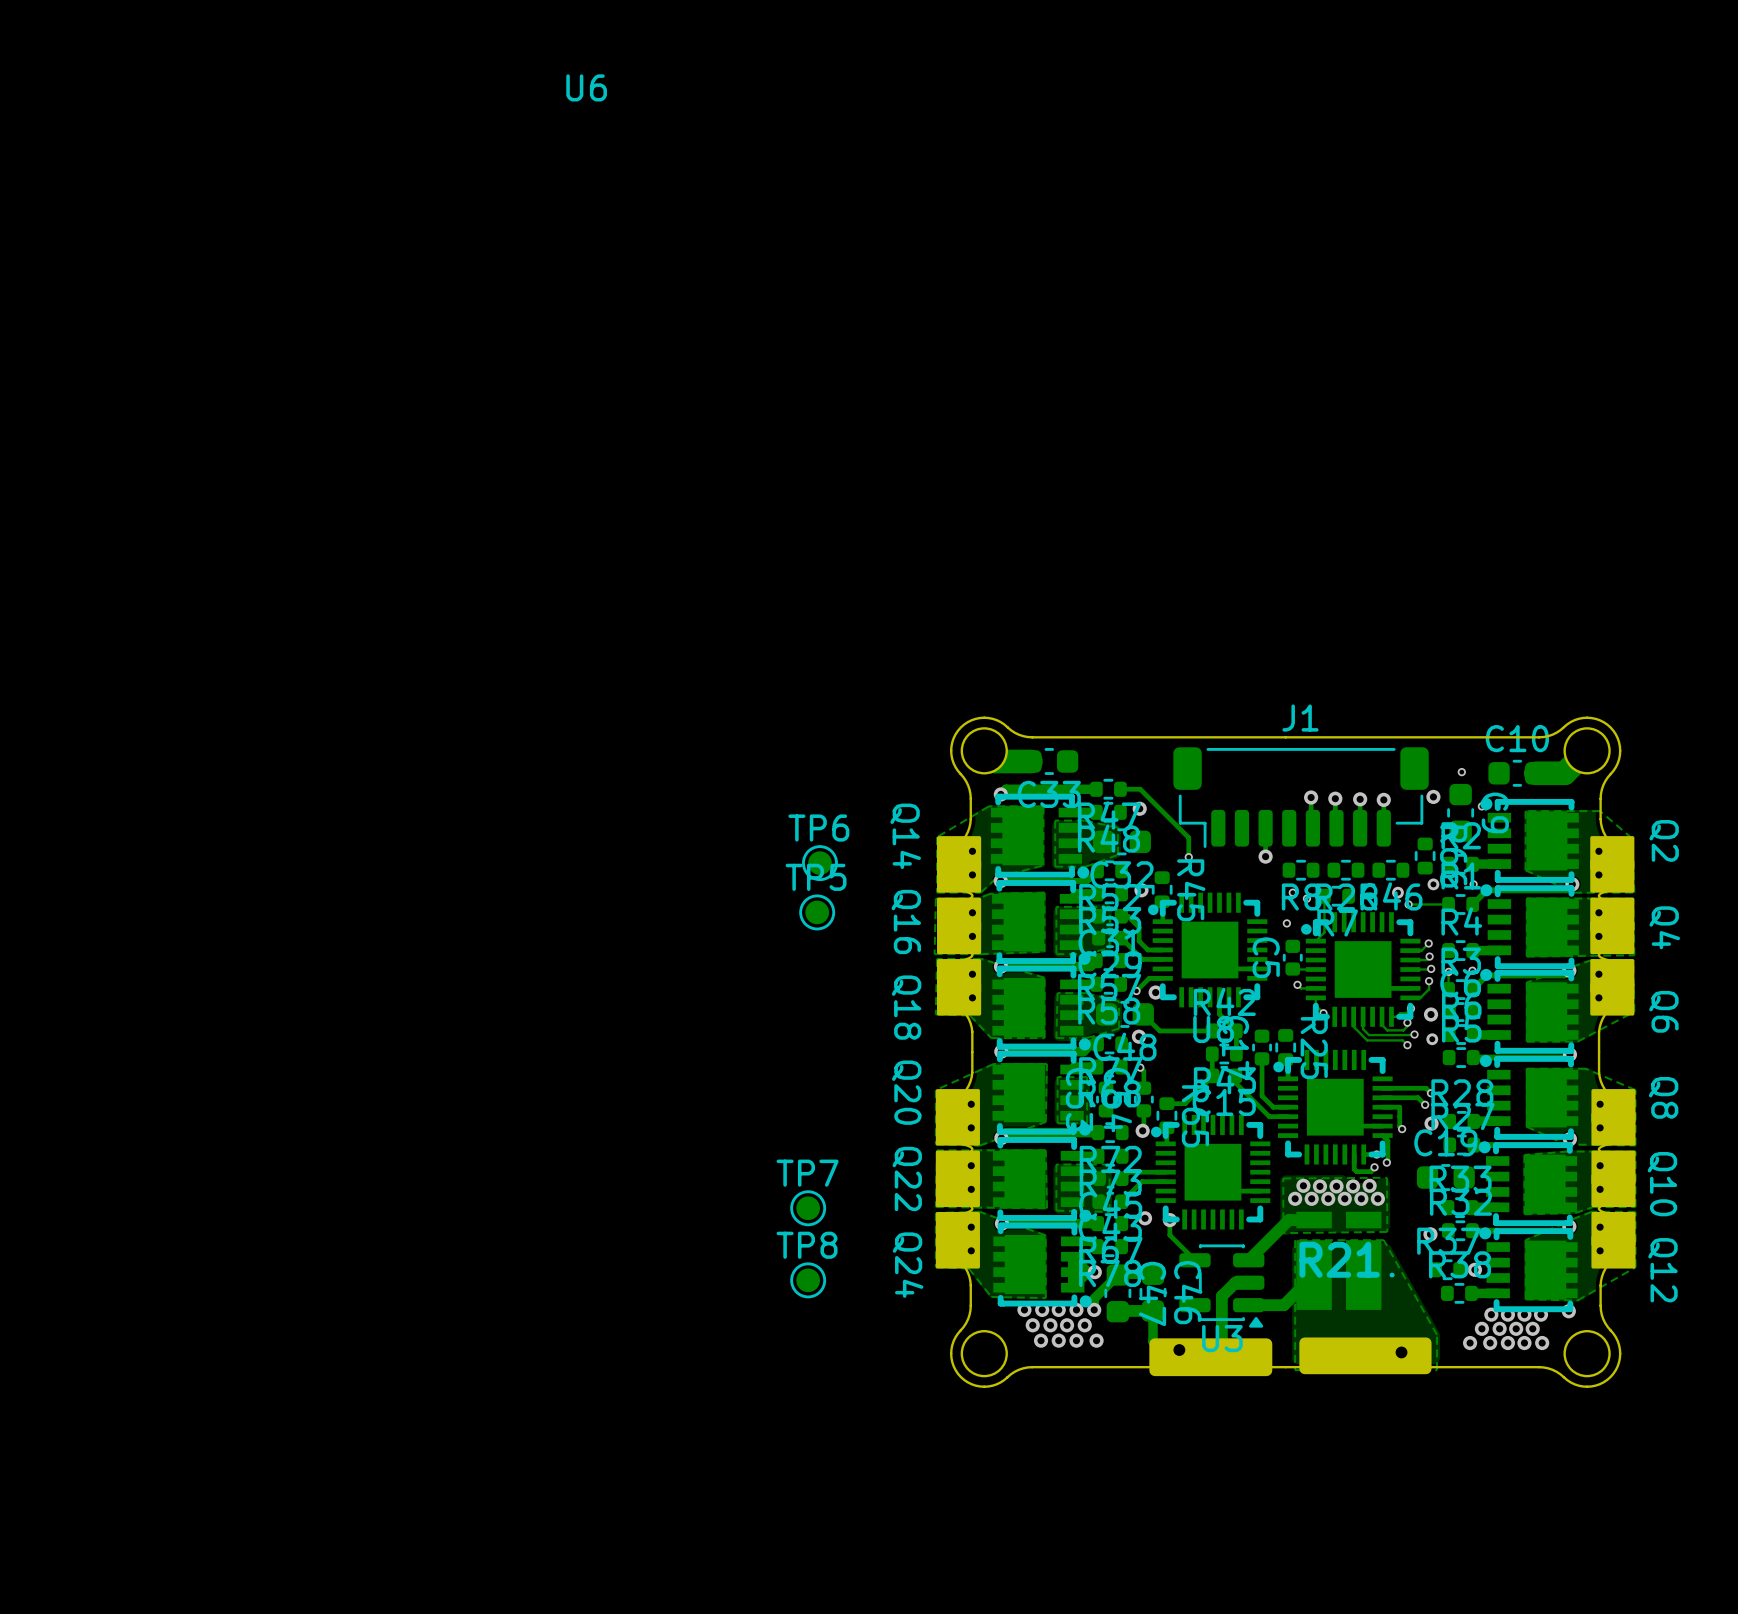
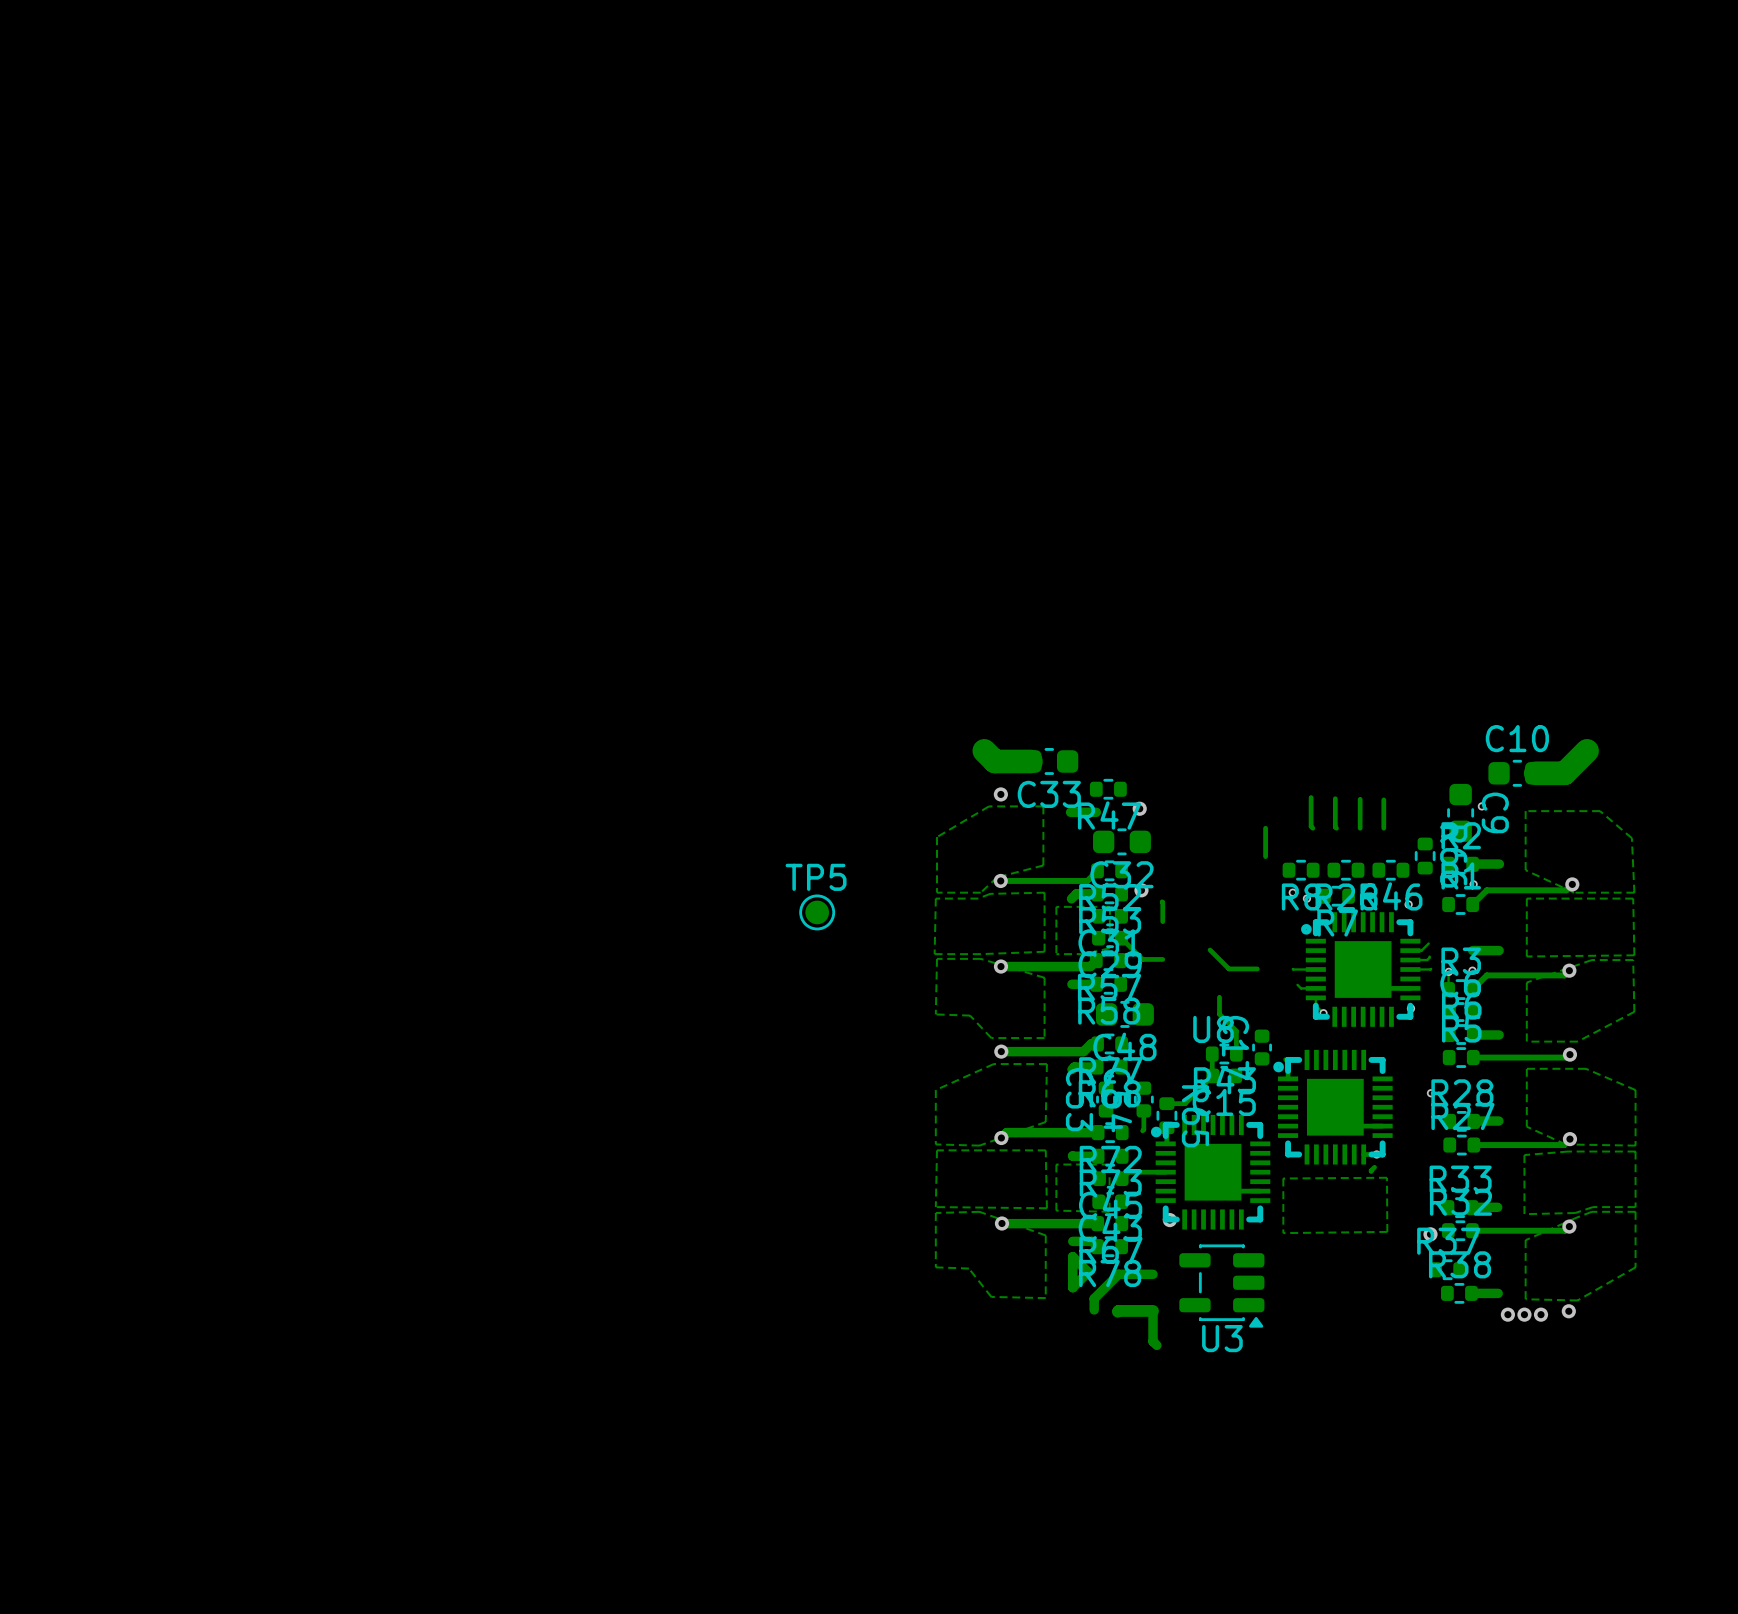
via: (1461, 772) -> none
track: (1096, 789) (1006, 789) (1000, 794) -> none
track: (1120, 789) (1140, 789) (1188, 837) (1188, 857) -> none
via: (1433, 796) -> none
J1: (1301, 797) -> none
via: (1311, 797) -> none
via: (1335, 798) -> none
via: (1360, 799) -> none
via: (1383, 799) -> none
R48: (1108, 812) -> none
zone outline: (1084, 820) (1117, 827) (1117, 854) (1085, 866) (1055, 866) (1055, 820) (1084, 820) -> none
Q14: (1040, 836) -> none
Q2: (1529, 840) -> none
via: (1265, 856) -> none
via: (1188, 857) -> none
TP6: (819, 863) -> none
via: (1433, 884) -> none
R45: (1162, 889) -> none
via: (1397, 892) -> none
track: (1324, 896) (1324, 932) (1315, 941) -> none
track: (1448, 904) (1408, 904) -> none
track: (1121, 916) (1128, 916) (1139, 927) (1139, 941) (1147, 950) (1162, 950) -> none
Q16: (1041, 922) -> none
via: (1286, 923) -> none
Q4: (1529, 926) -> none
via: (1428, 943) -> none
U6: (1207, 950) -> none
R4: (1460, 950) -> none
via: (1429, 956) -> none
C5: (1292, 957) -> none
via: (1431, 968) -> none
track: (1162, 978) (1149, 978) (1136, 991) -> none
track: (1429, 981) (1429, 989) (1420, 997) (1410, 997) -> none
via: (1429, 981) -> none
via: (1297, 984) -> none
via: (1136, 991) -> none
via: (1155, 992) -> none
zone outline: (1085, 993) (1119, 1001) (1119, 1028) (1087, 1038) (1056, 1038) (1057, 993) (1085, 993) -> none
Q18: (1041, 1008) -> none
track: (1410, 1008) (1406, 1013) (1391, 1016) -> none
Q6: (1529, 1011) -> none
track: (1143, 1014) (1159, 1030) (1212, 1030) -> none
via: (1431, 1014) -> none
track: (1353, 1016) (1353, 1026) (1367, 1040) (1402, 1040) (1407, 1045) -> none
track: (1363, 1016) (1363, 1029) (1369, 1035) (1414, 1034) -> none
track: (1382, 1016) (1382, 1025) (1387, 1030) (1403, 1030) (1407, 1026) (1407, 1022) -> none
via: (1407, 1022) -> none
R42: (1224, 1030) -> none
via: (1414, 1034) -> none
via: (1138, 1036) -> none
via: (1432, 1039) -> none
via: (1407, 1045) -> none
R25: (1285, 1047) -> none
part: (1285, 1052) -> none
track: (1262, 1058) (1262, 1095) (1273, 1107) (1288, 1107) -> none
track: (1140, 1067) (1143, 1071) (1143, 1088) -> none
via: (1140, 1067) -> none
track: (1235, 1075) (1235, 1082) (1269, 1116) (1288, 1116) -> none
zone outline: (1087, 1077) (1087, 1123) (1057, 1123) (1057, 1077) (1087, 1077) -> none
track: (1382, 1088) (1426, 1088) (1430, 1093) -> none
Q20: (1041, 1093) -> none
track: (1382, 1097) (1418, 1097) (1425, 1104) -> none
Q8: (1529, 1097) -> none
via: (1425, 1104) -> none
track: (1382, 1107) (1399, 1107) (1399, 1126) (1402, 1129) -> none
via: (1431, 1123) -> none
via: (1402, 1129) -> none
via: (1142, 1130) -> none
track: (1382, 1135) (1387, 1140) (1386, 1162) -> none
track: (1354, 1154) (1354, 1169) (1356, 1171) (1371, 1171) -> none
via: (1386, 1162) -> none
via: (1374, 1167) -> none
C19: (1445, 1177) -> none
Q22: (1042, 1179) -> none
track: (1165, 1181) (1142, 1181) (1121, 1201) -> none
Q10: (1527, 1183) -> none
via: (1303, 1185) -> none
via: (1369, 1185) -> none
via: (1319, 1186) -> none
via: (1336, 1186) -> none
via: (1353, 1186) -> none
via: (1295, 1198) -> none
via: (1311, 1198) -> none
via: (1328, 1198) -> none
via: (1344, 1198) -> none
via: (1361, 1198) -> none
via: (1377, 1198) -> none
TP7: (808, 1208) -> none
via: (1145, 1218) -> none
track: (1169, 1220) (1169, 1235) (1194, 1260) -> none
track: (1314, 1220) (1288, 1220) (1248, 1260) -> none
zone outline: (1383, 1240) (1436, 1334) (1436, 1370) (1295, 1370) (1295, 1240) (1383, 1240) -> none
R21: (1345, 1260) -> none
Q24: (1042, 1265) -> none
via: (1474, 1269) -> none
Q12: (1528, 1269) -> none
via: (1094, 1272) -> none
track: (1314, 1275) (1283, 1305) (1248, 1305) -> none
TP8: (808, 1280) -> none
track: (1248, 1282) (1235, 1282) (1221, 1296) (1221, 1346) -> none
C46: (1153, 1292) -> none
C47: (1117, 1293) -> none
via: (1024, 1309) -> none
via: (1042, 1309) -> none
via: (1058, 1309) -> none
via: (1076, 1309) -> none
via: (1094, 1309) -> none
via: (1491, 1314) -> none
via: (1032, 1325) -> none
via: (1050, 1325) -> none
via: (1067, 1325) -> none
via: (1084, 1325) -> none
via: (1481, 1328) -> none
via: (1499, 1328) -> none
via: (1516, 1328) -> none
via: (1532, 1328) -> none
via: (1041, 1340) -> none
via: (1058, 1340) -> none
via: (1076, 1340) -> none
via: (1096, 1340) -> none
via: (1470, 1343) -> none
via: (1490, 1343) -> none
via: (1507, 1343) -> none
via: (1524, 1343) -> none
via: (1542, 1343) -> none

